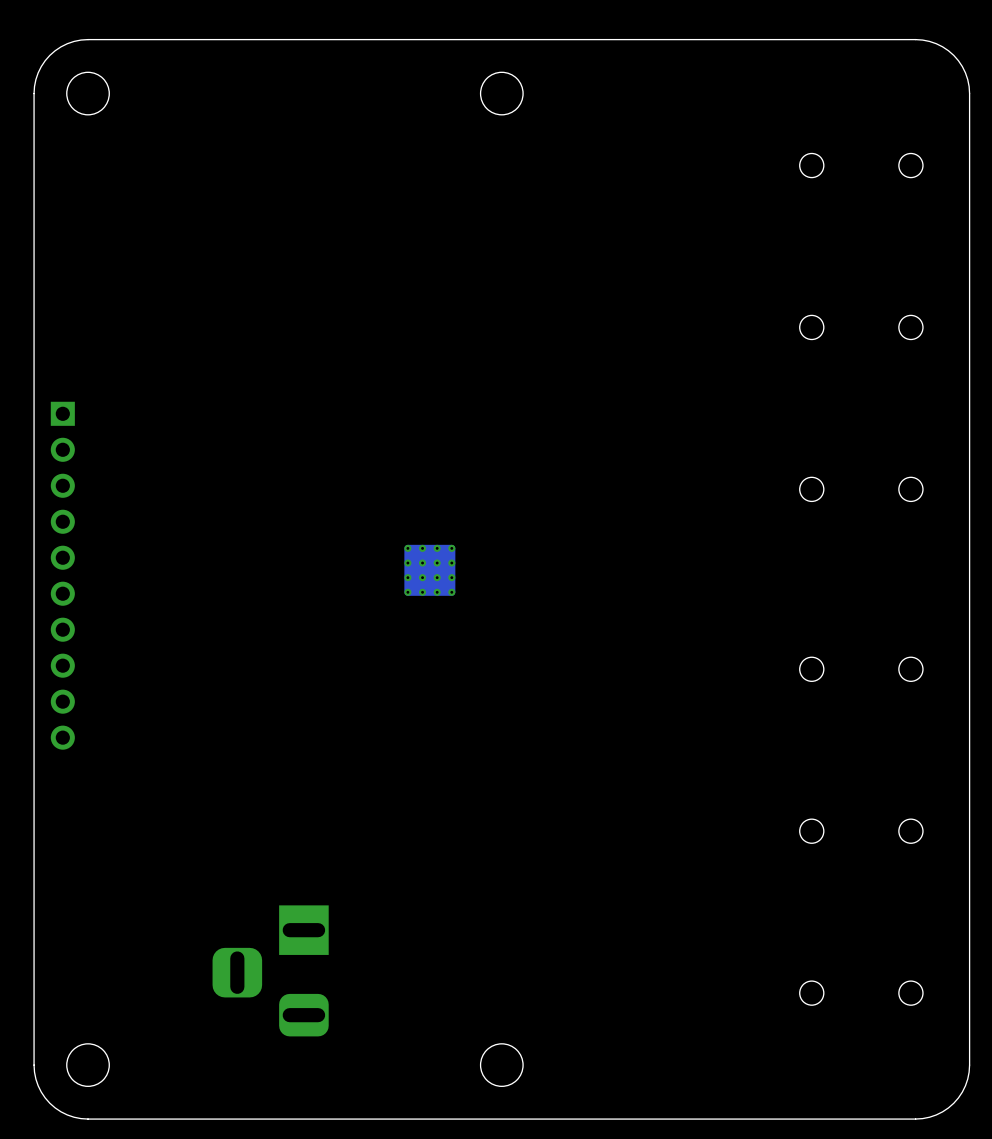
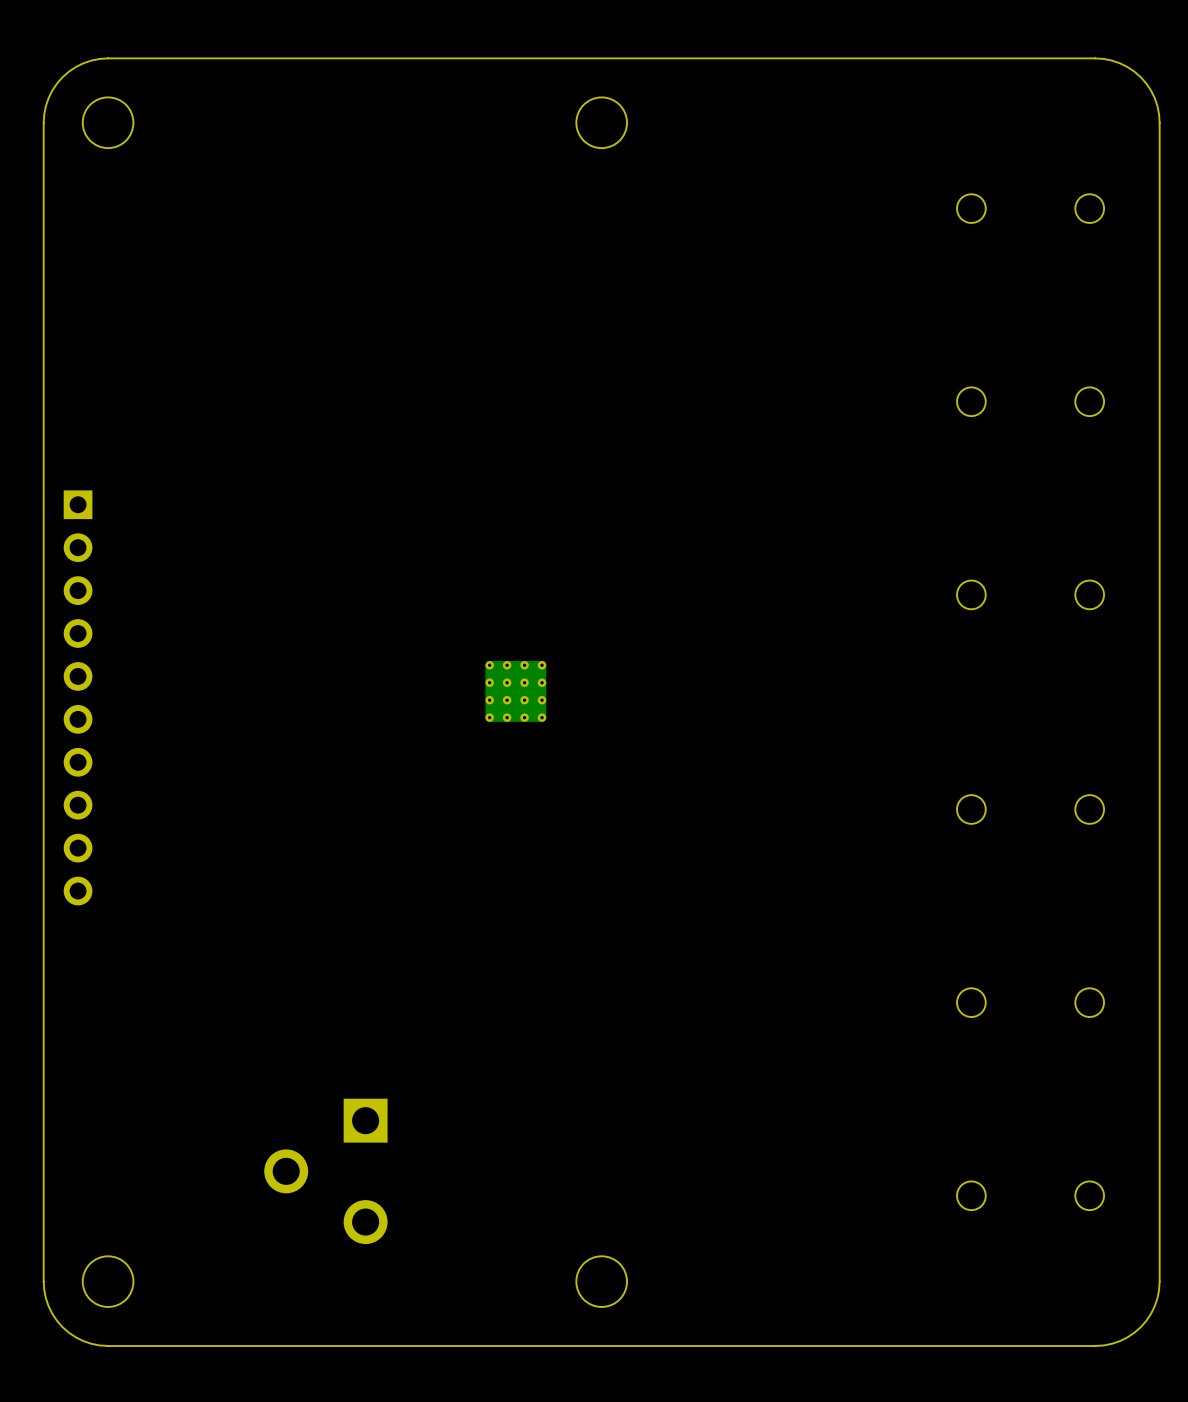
part footprint: [212, 905, 329, 1037] -> [264, 1098, 388, 1245]

